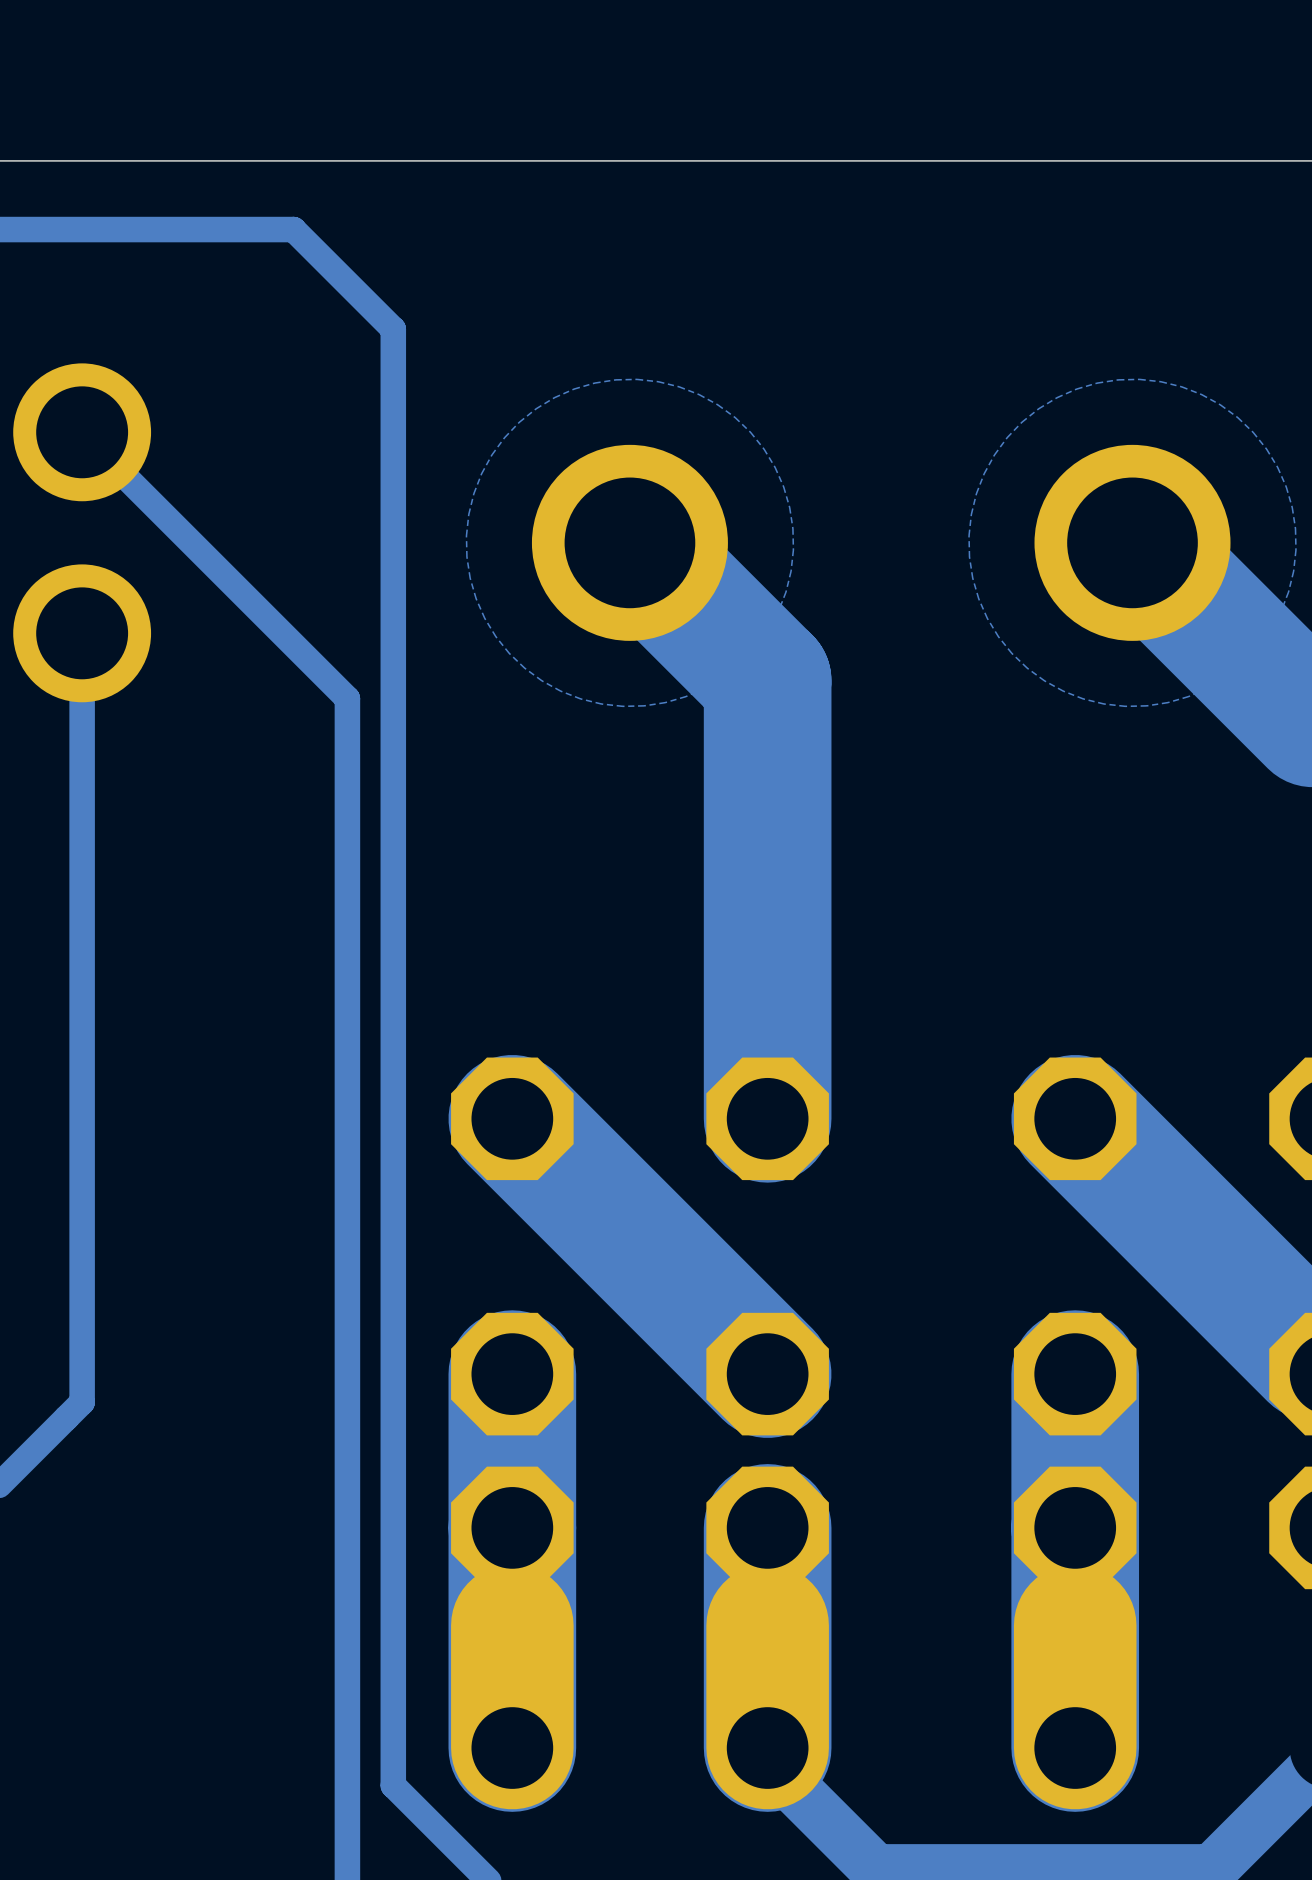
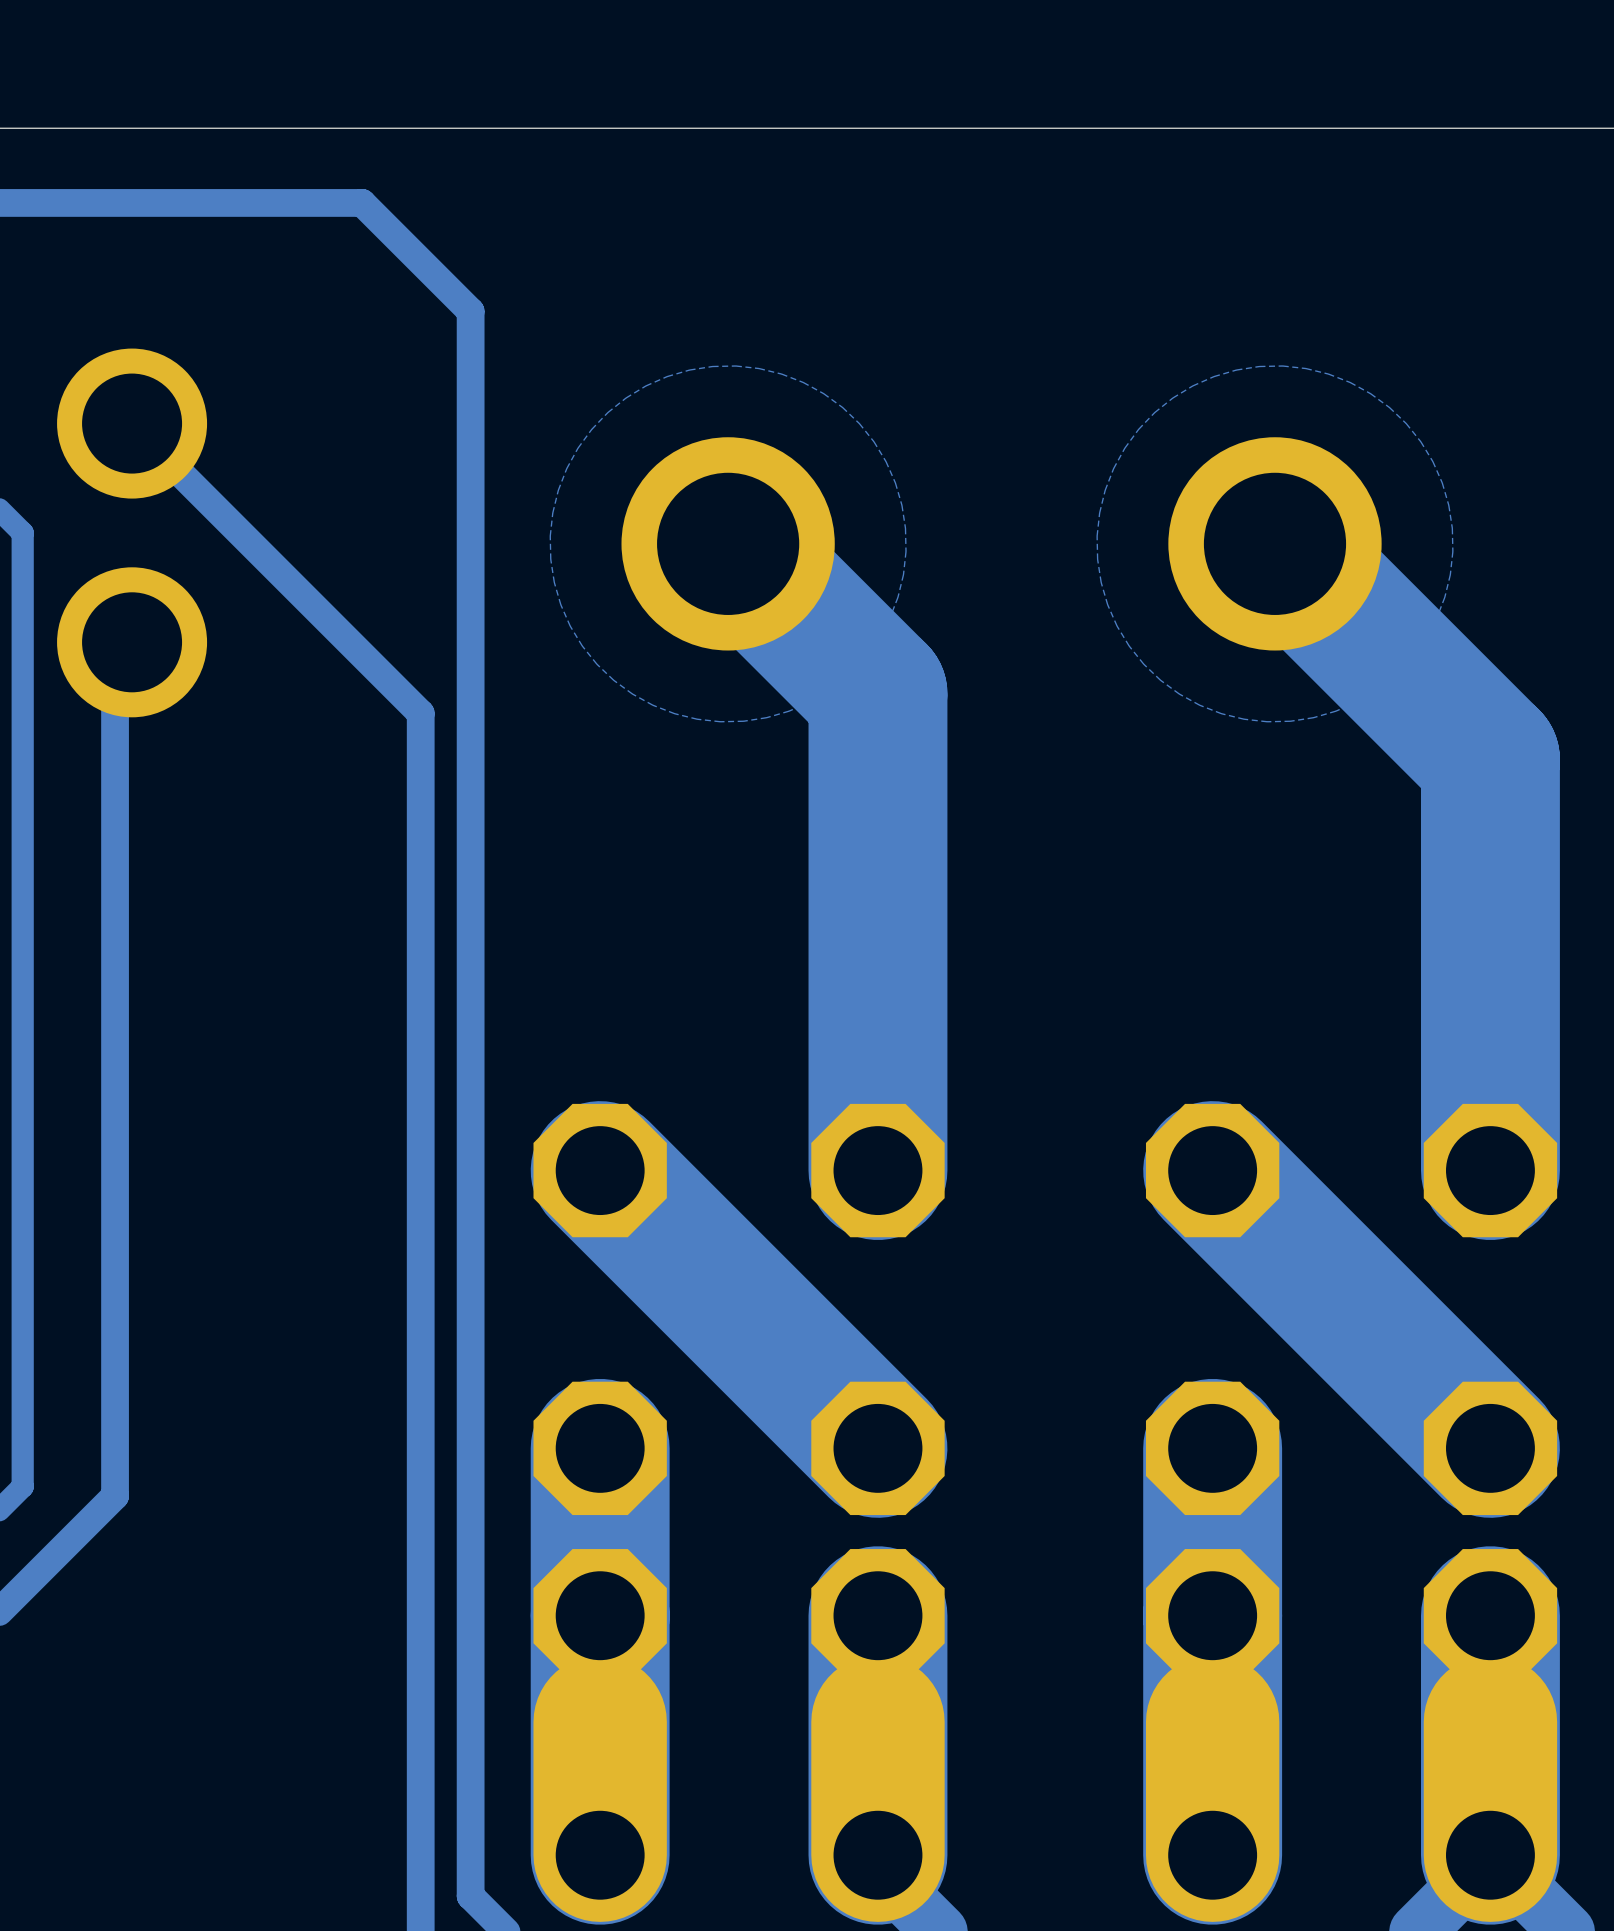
bottom track: (82, 633) (82, 1402) (66, 1417) -> (132, 642) (115, 651) (115, 1496)

